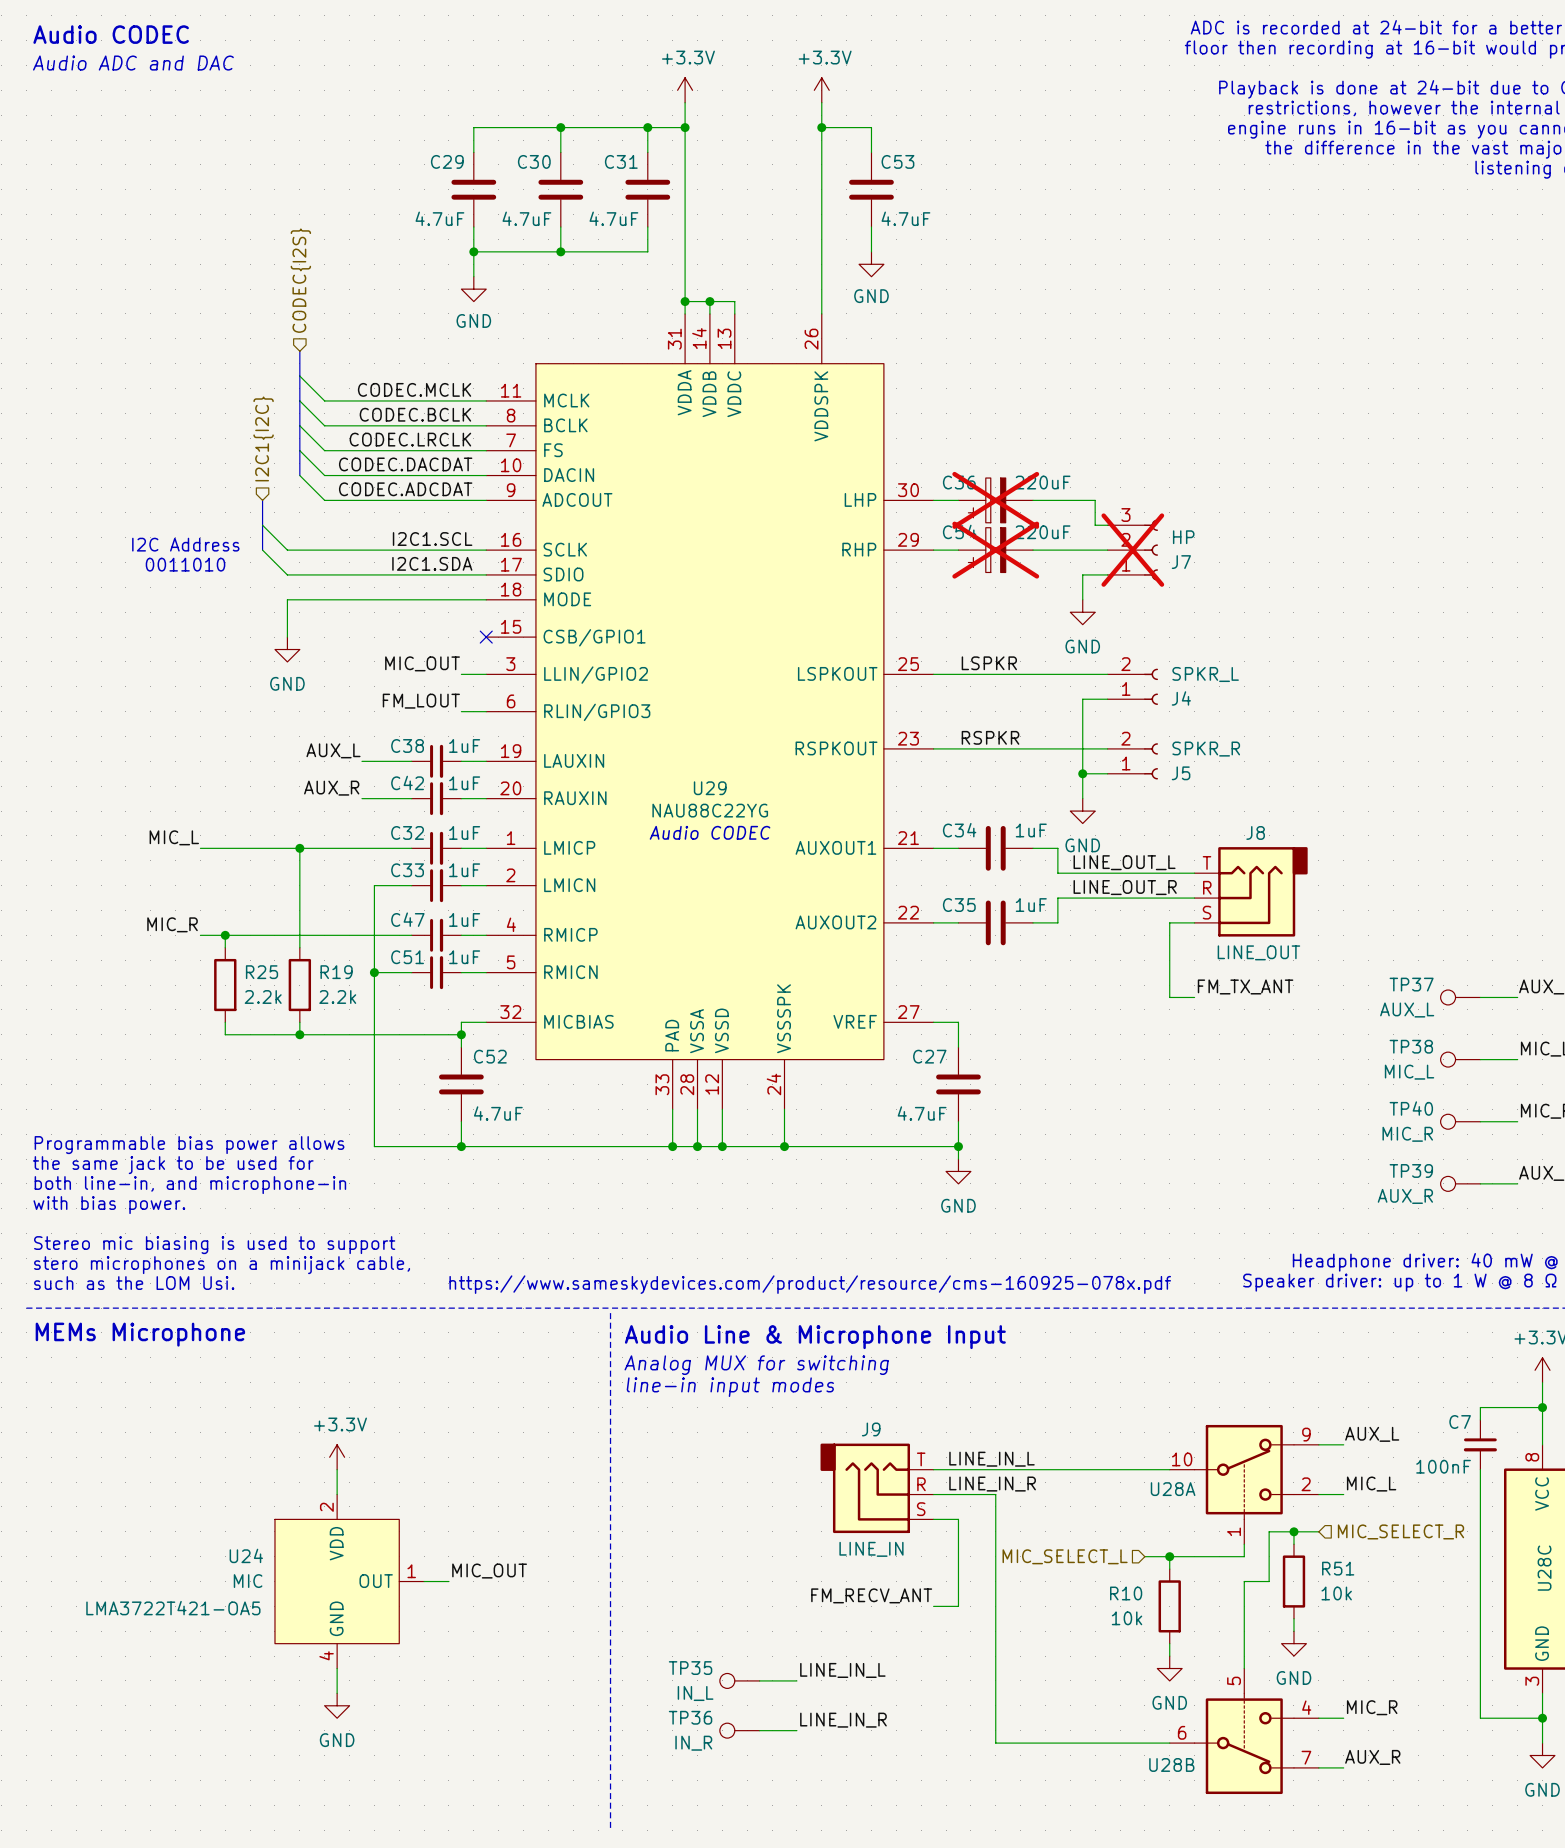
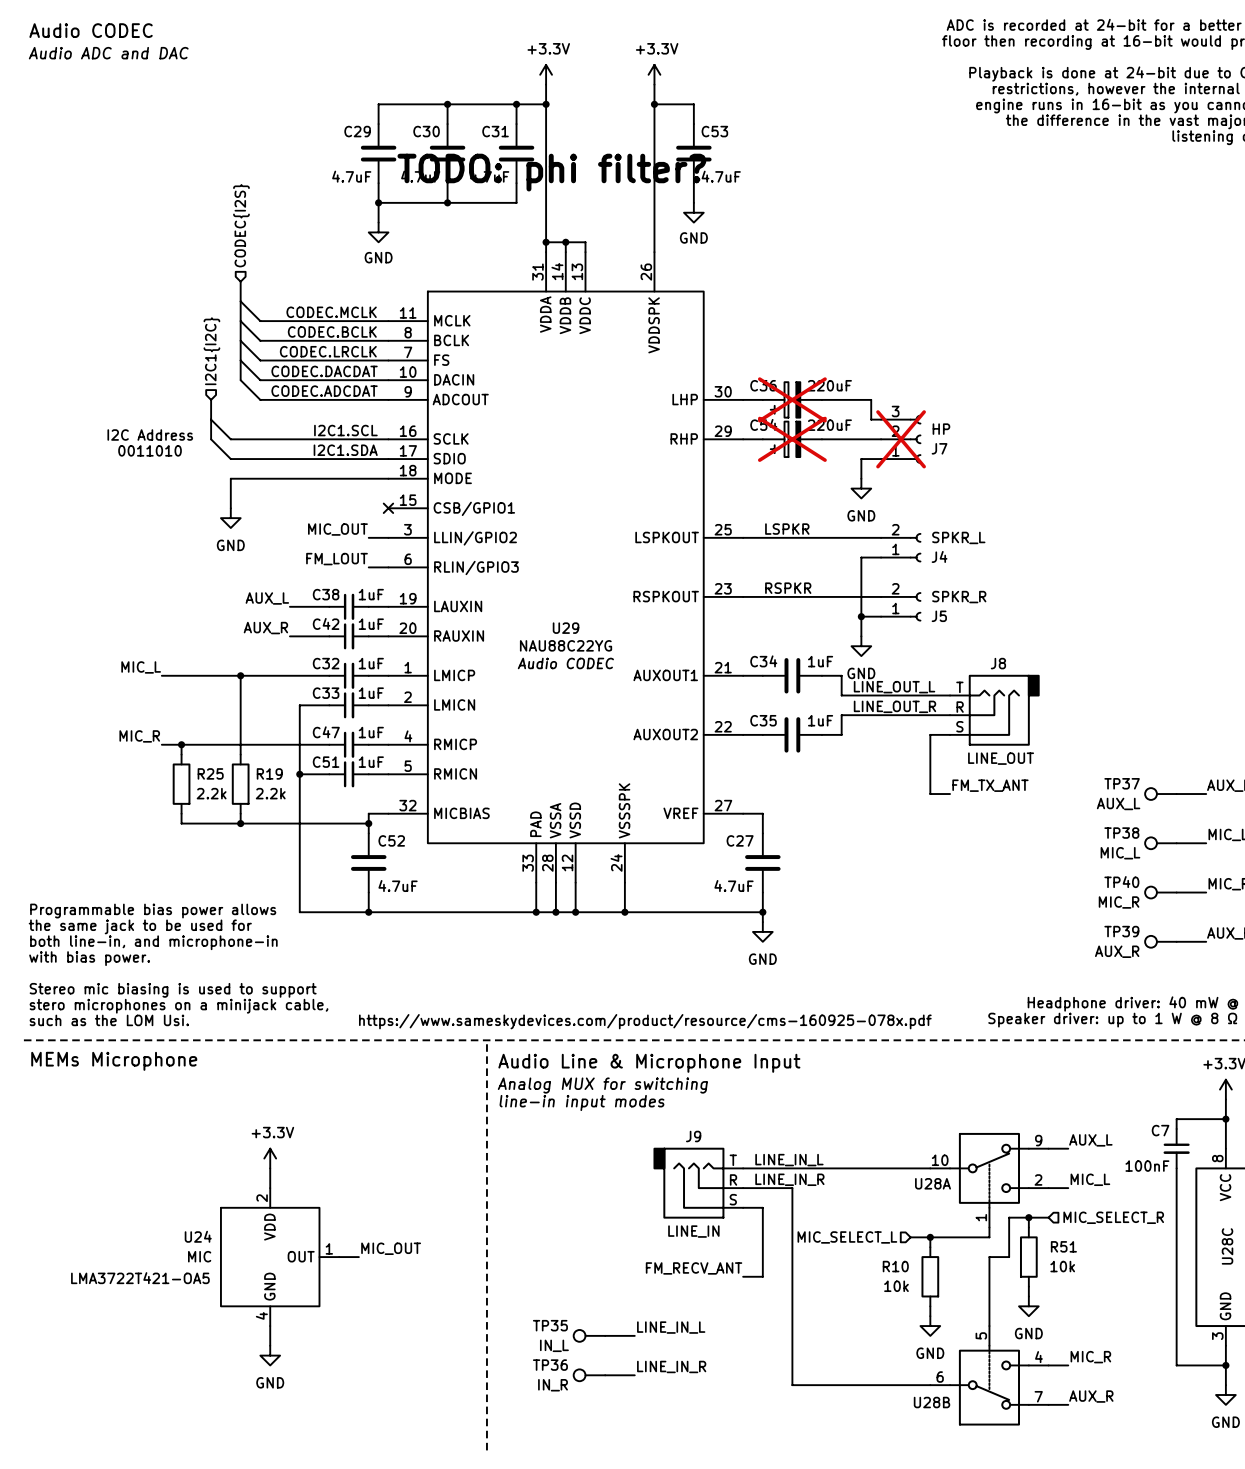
text: none -> TODO: phi filter? (551, 172)

